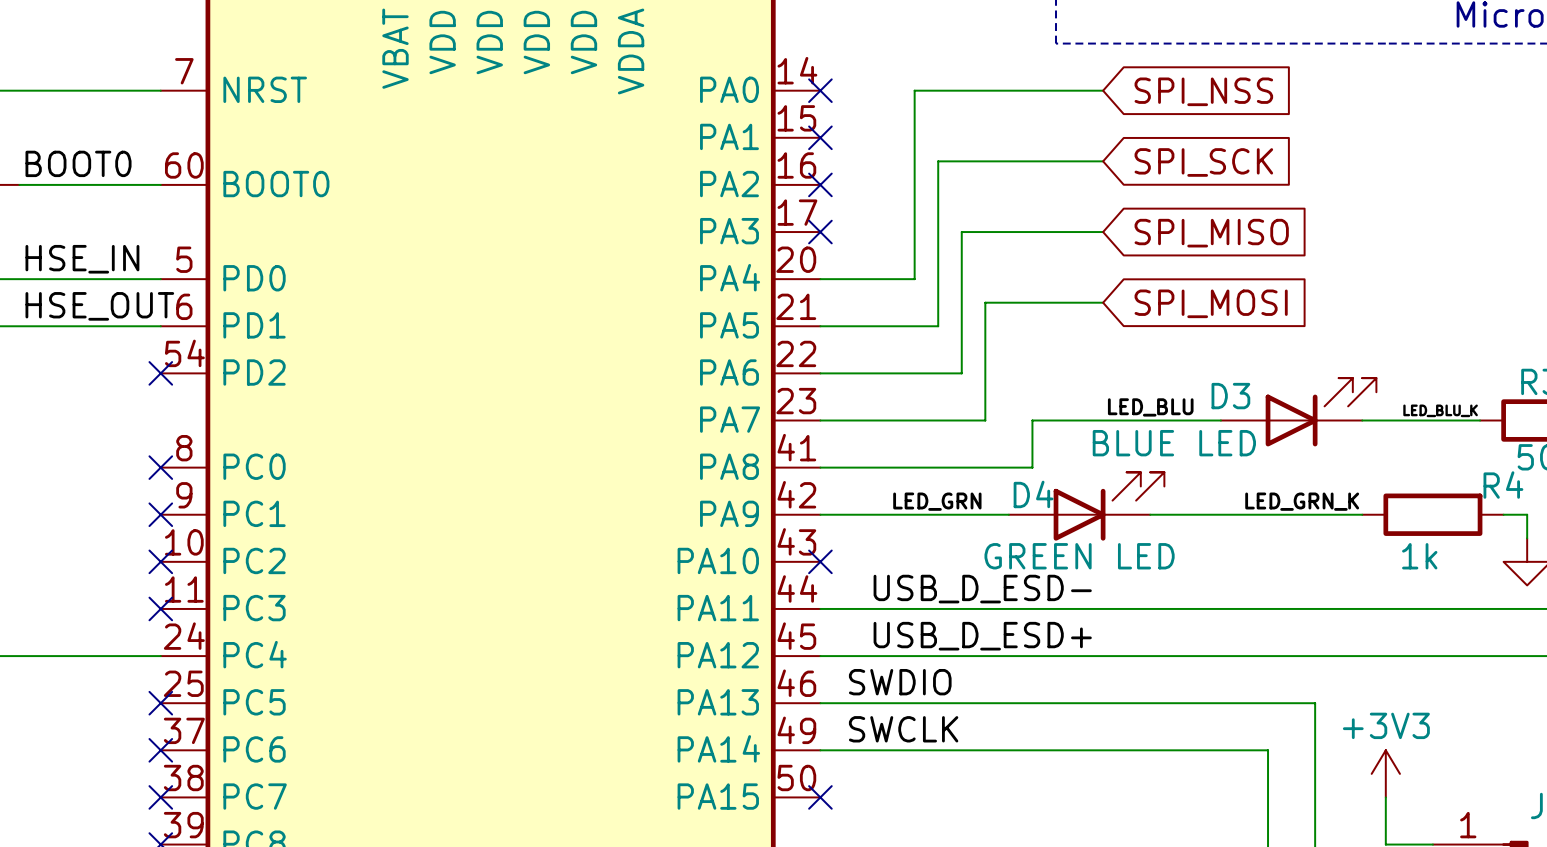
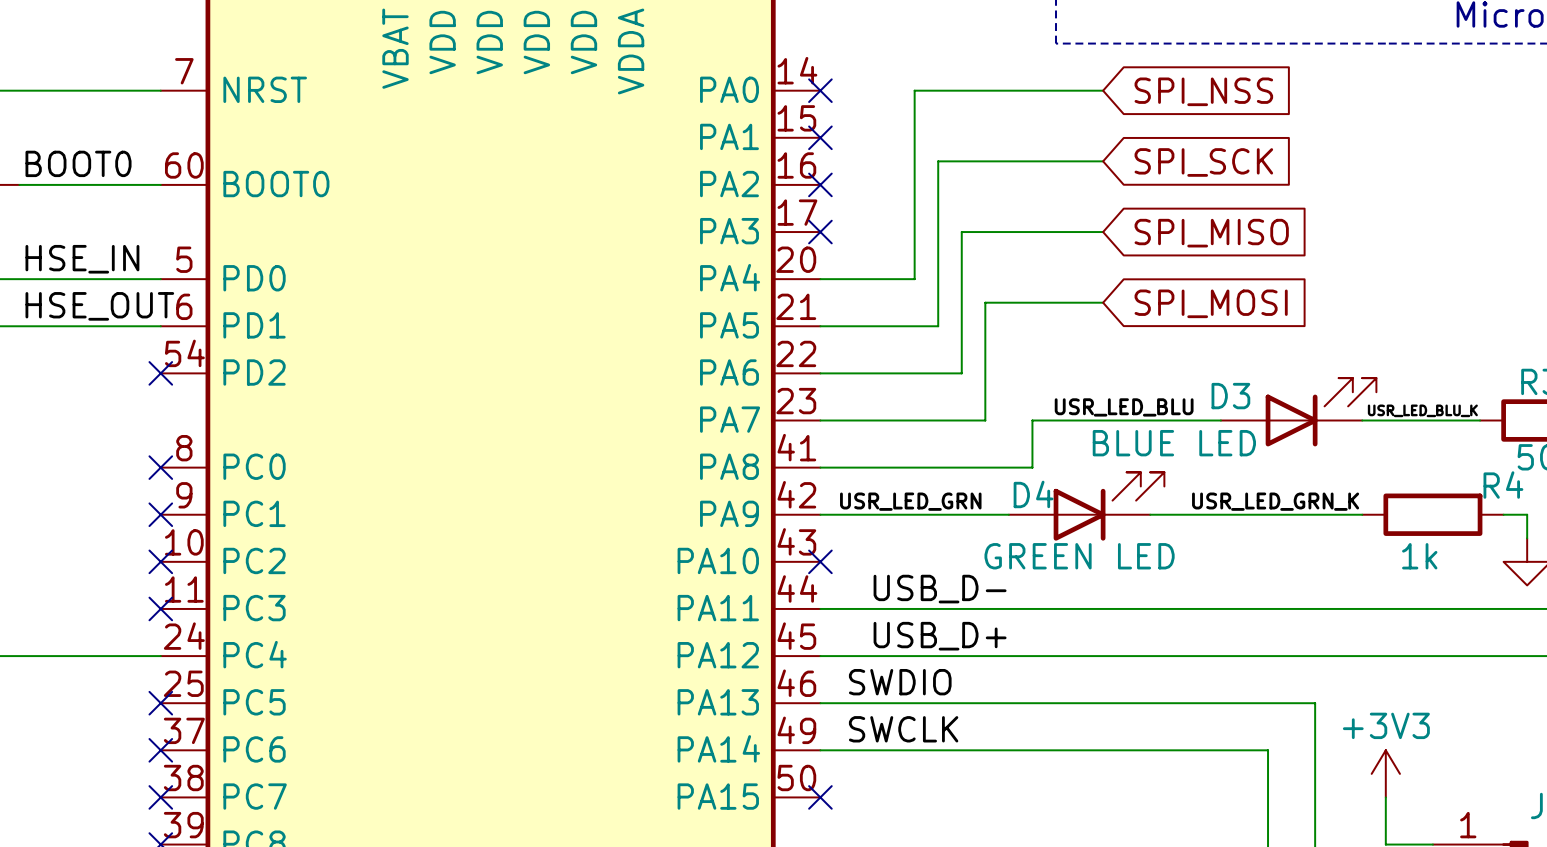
label: LED_BLU (1150, 407) -> USR_LED_BLU (1124, 407)
label: LED_BLU_K (1440, 410) -> USR_LED_BLU_K (1422, 410)
label: LED_GRN (937, 501) -> USR_LED_GRN (910, 501)
label: LED_GRN_K (1302, 501) -> USR_LED_GRN_K (1275, 501)
label: USB_D_ESD- (982, 589) -> USB_D- (940, 589)
label: USB_D_ESD+ (982, 636) -> USB_D+ (940, 636)

